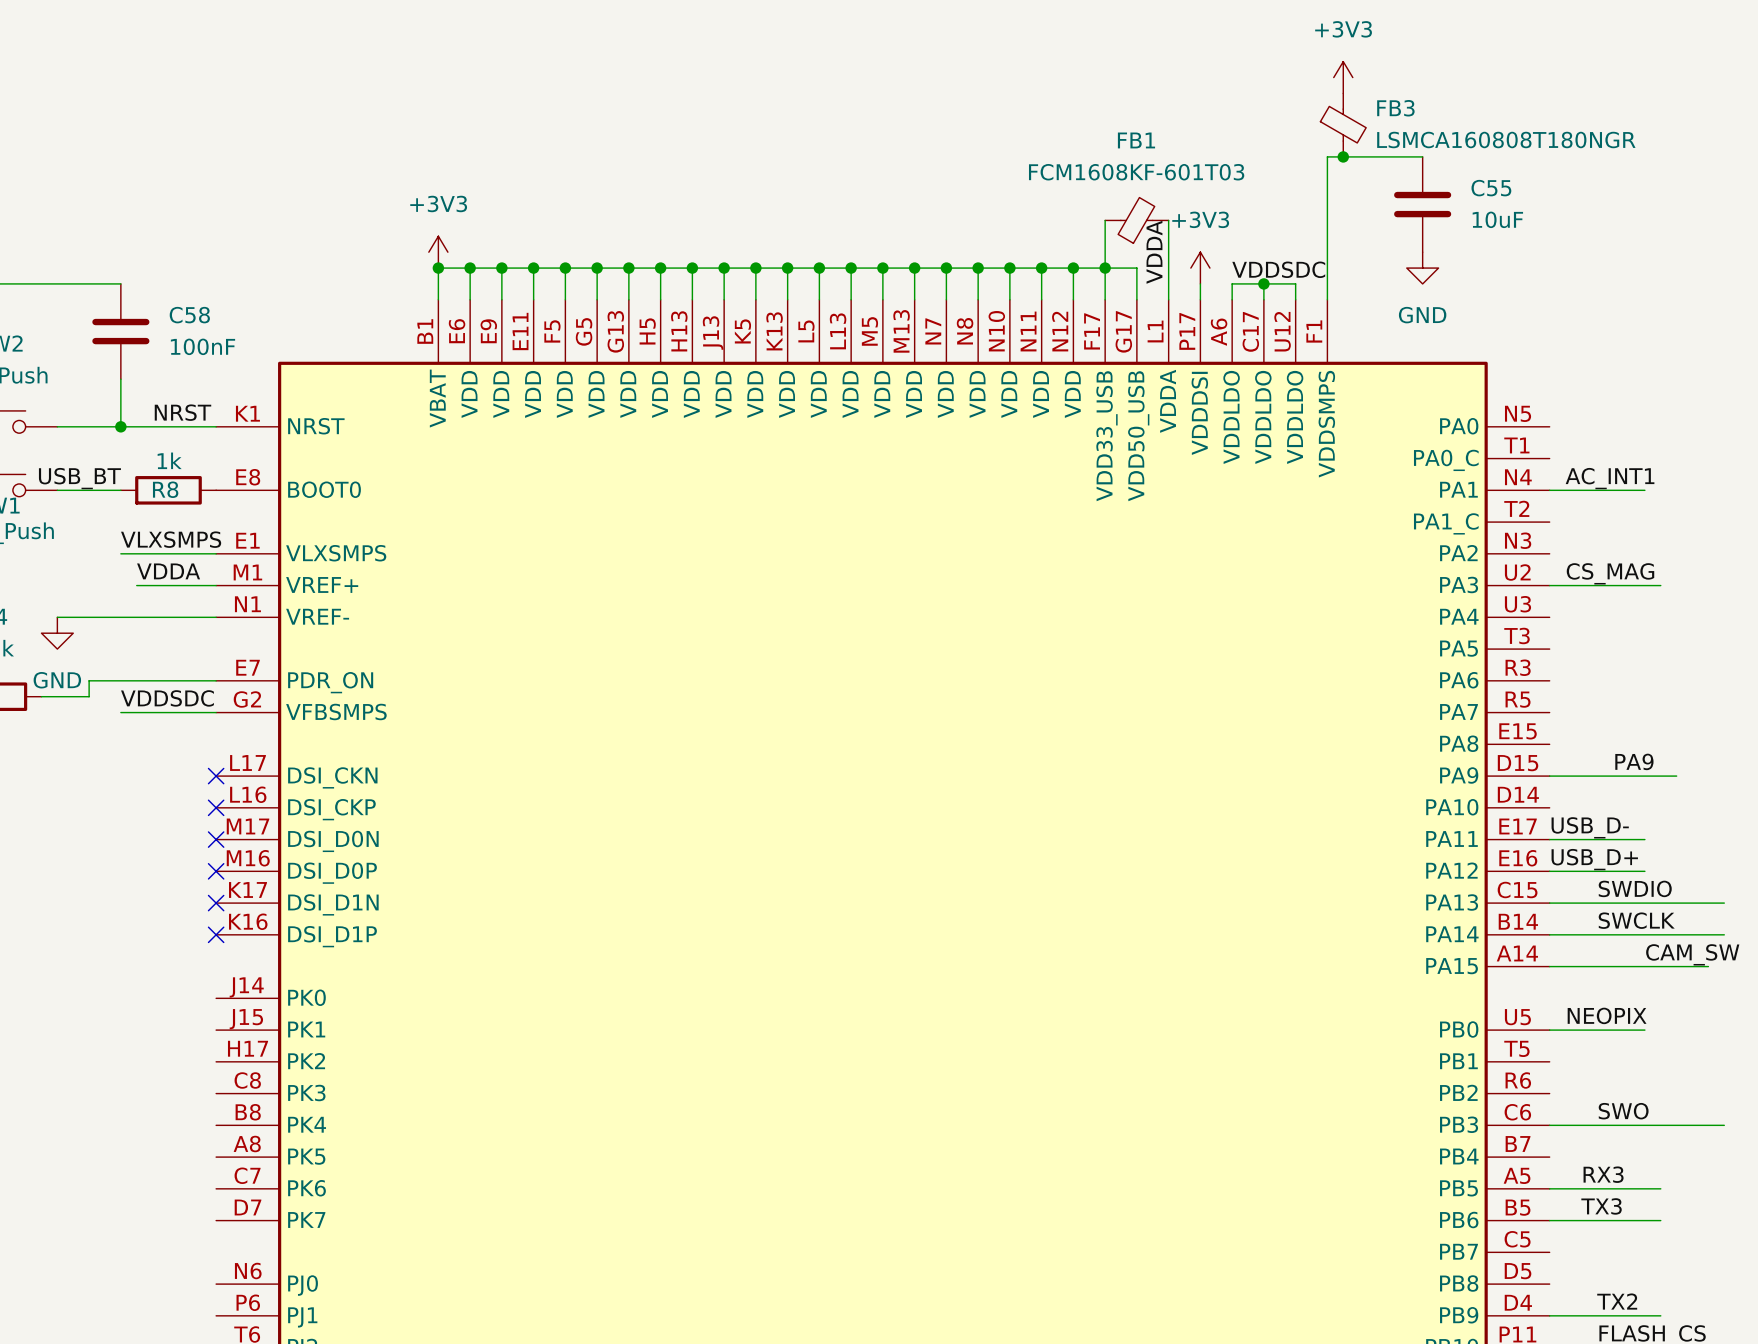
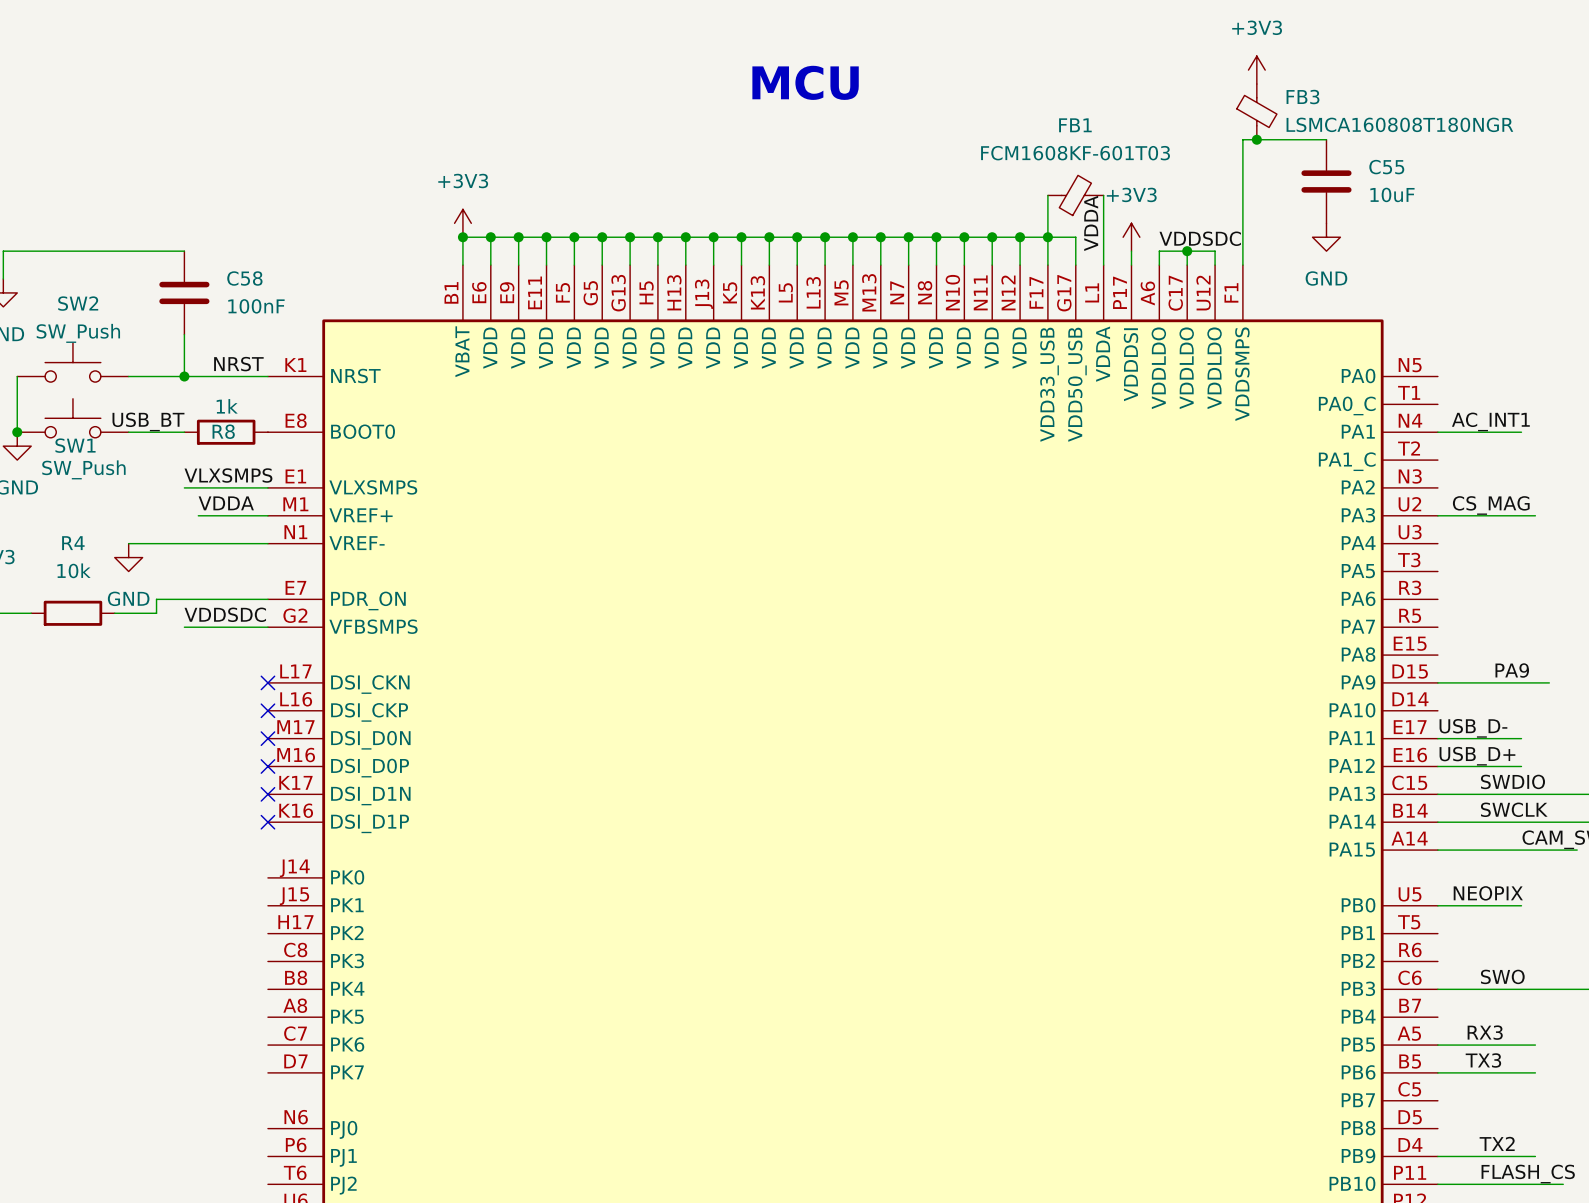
text: none -> MCU (805, 82)

